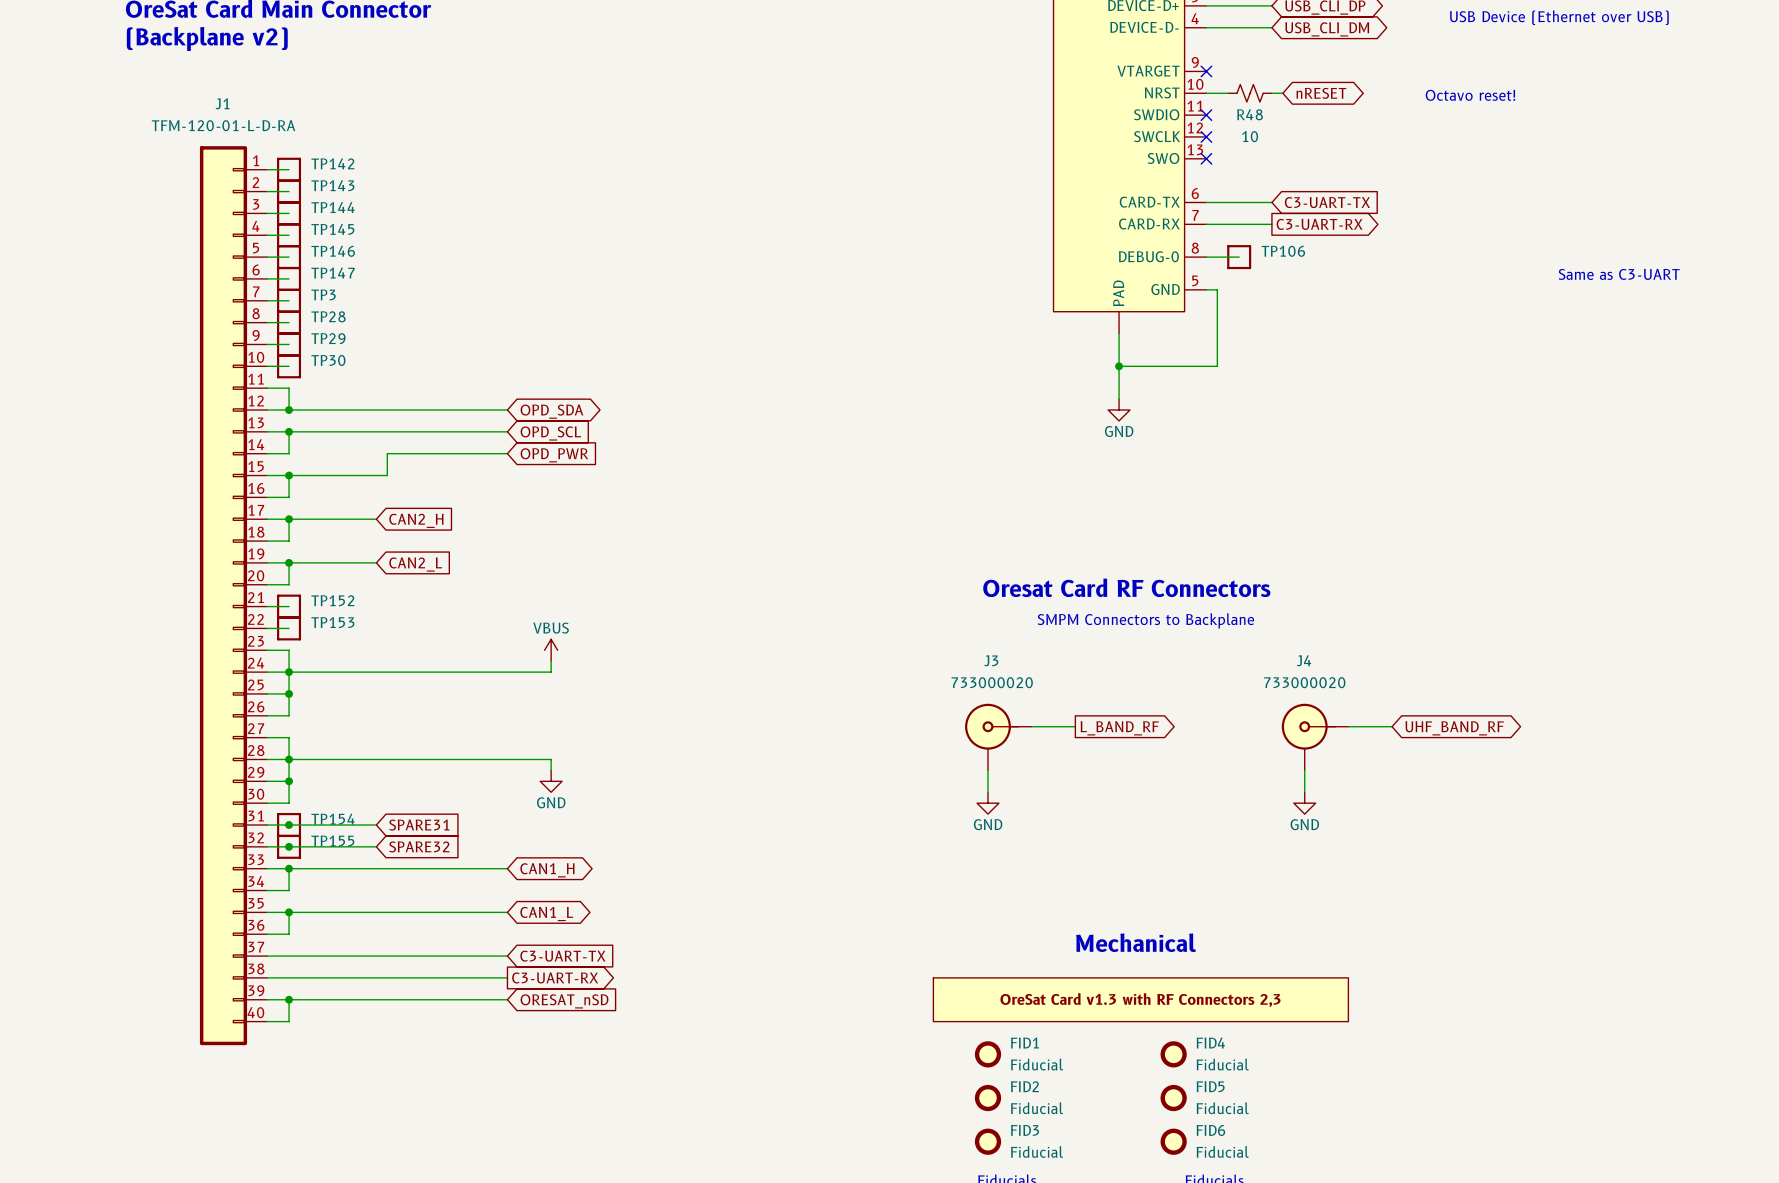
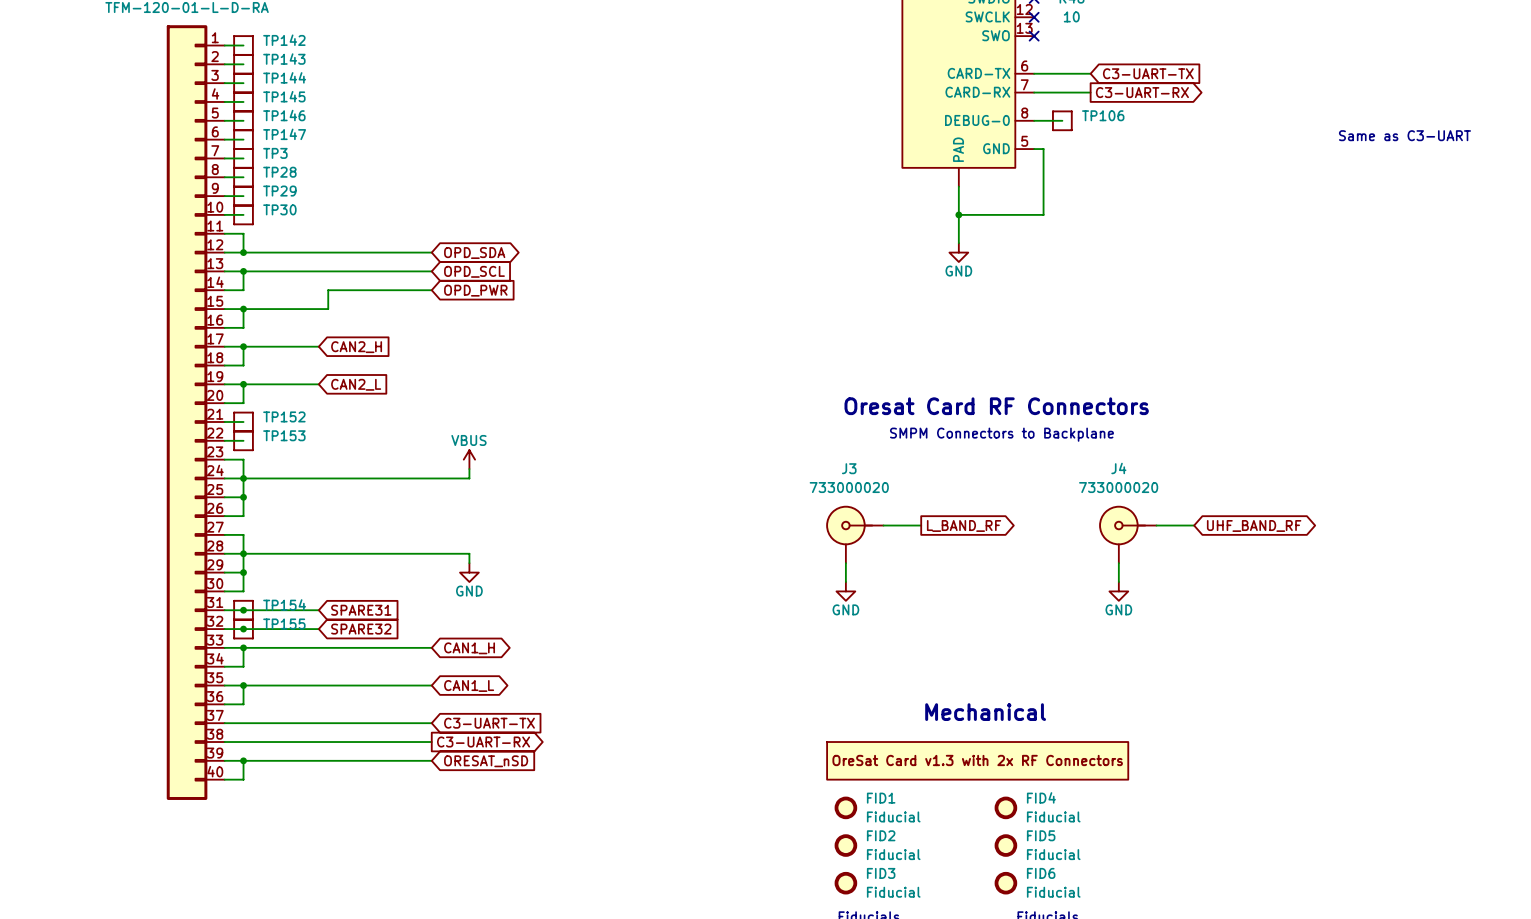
part symbol: [933, 977, 1349, 1022] -> [827, 742, 1129, 780]

